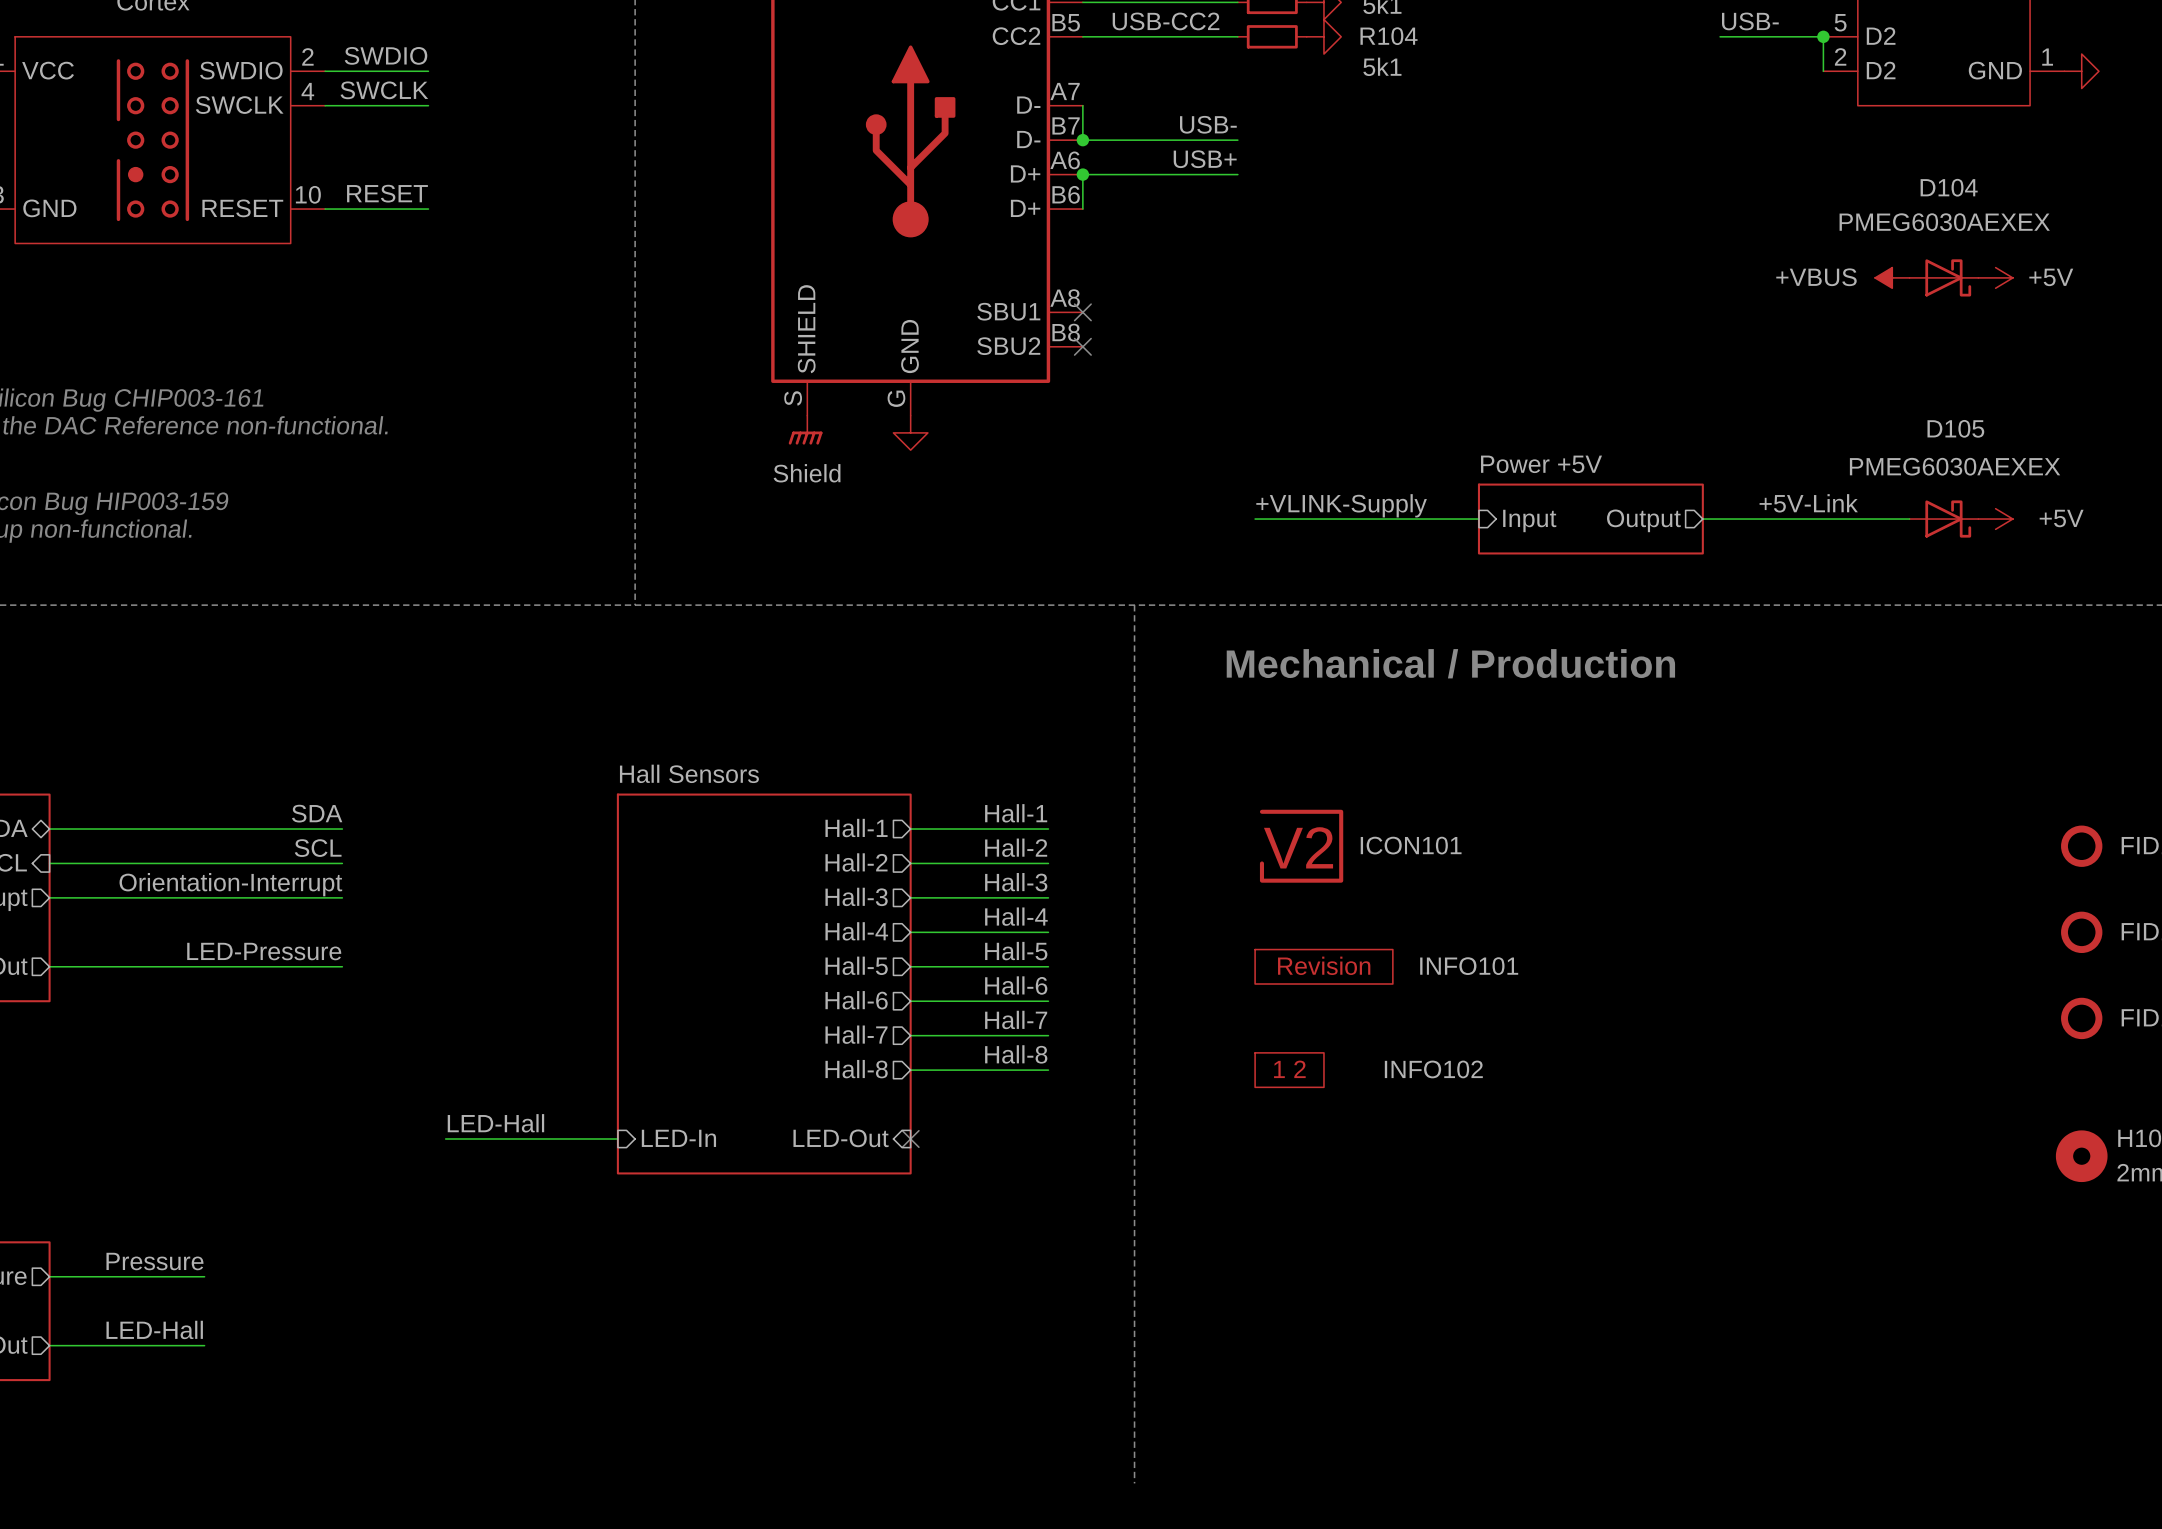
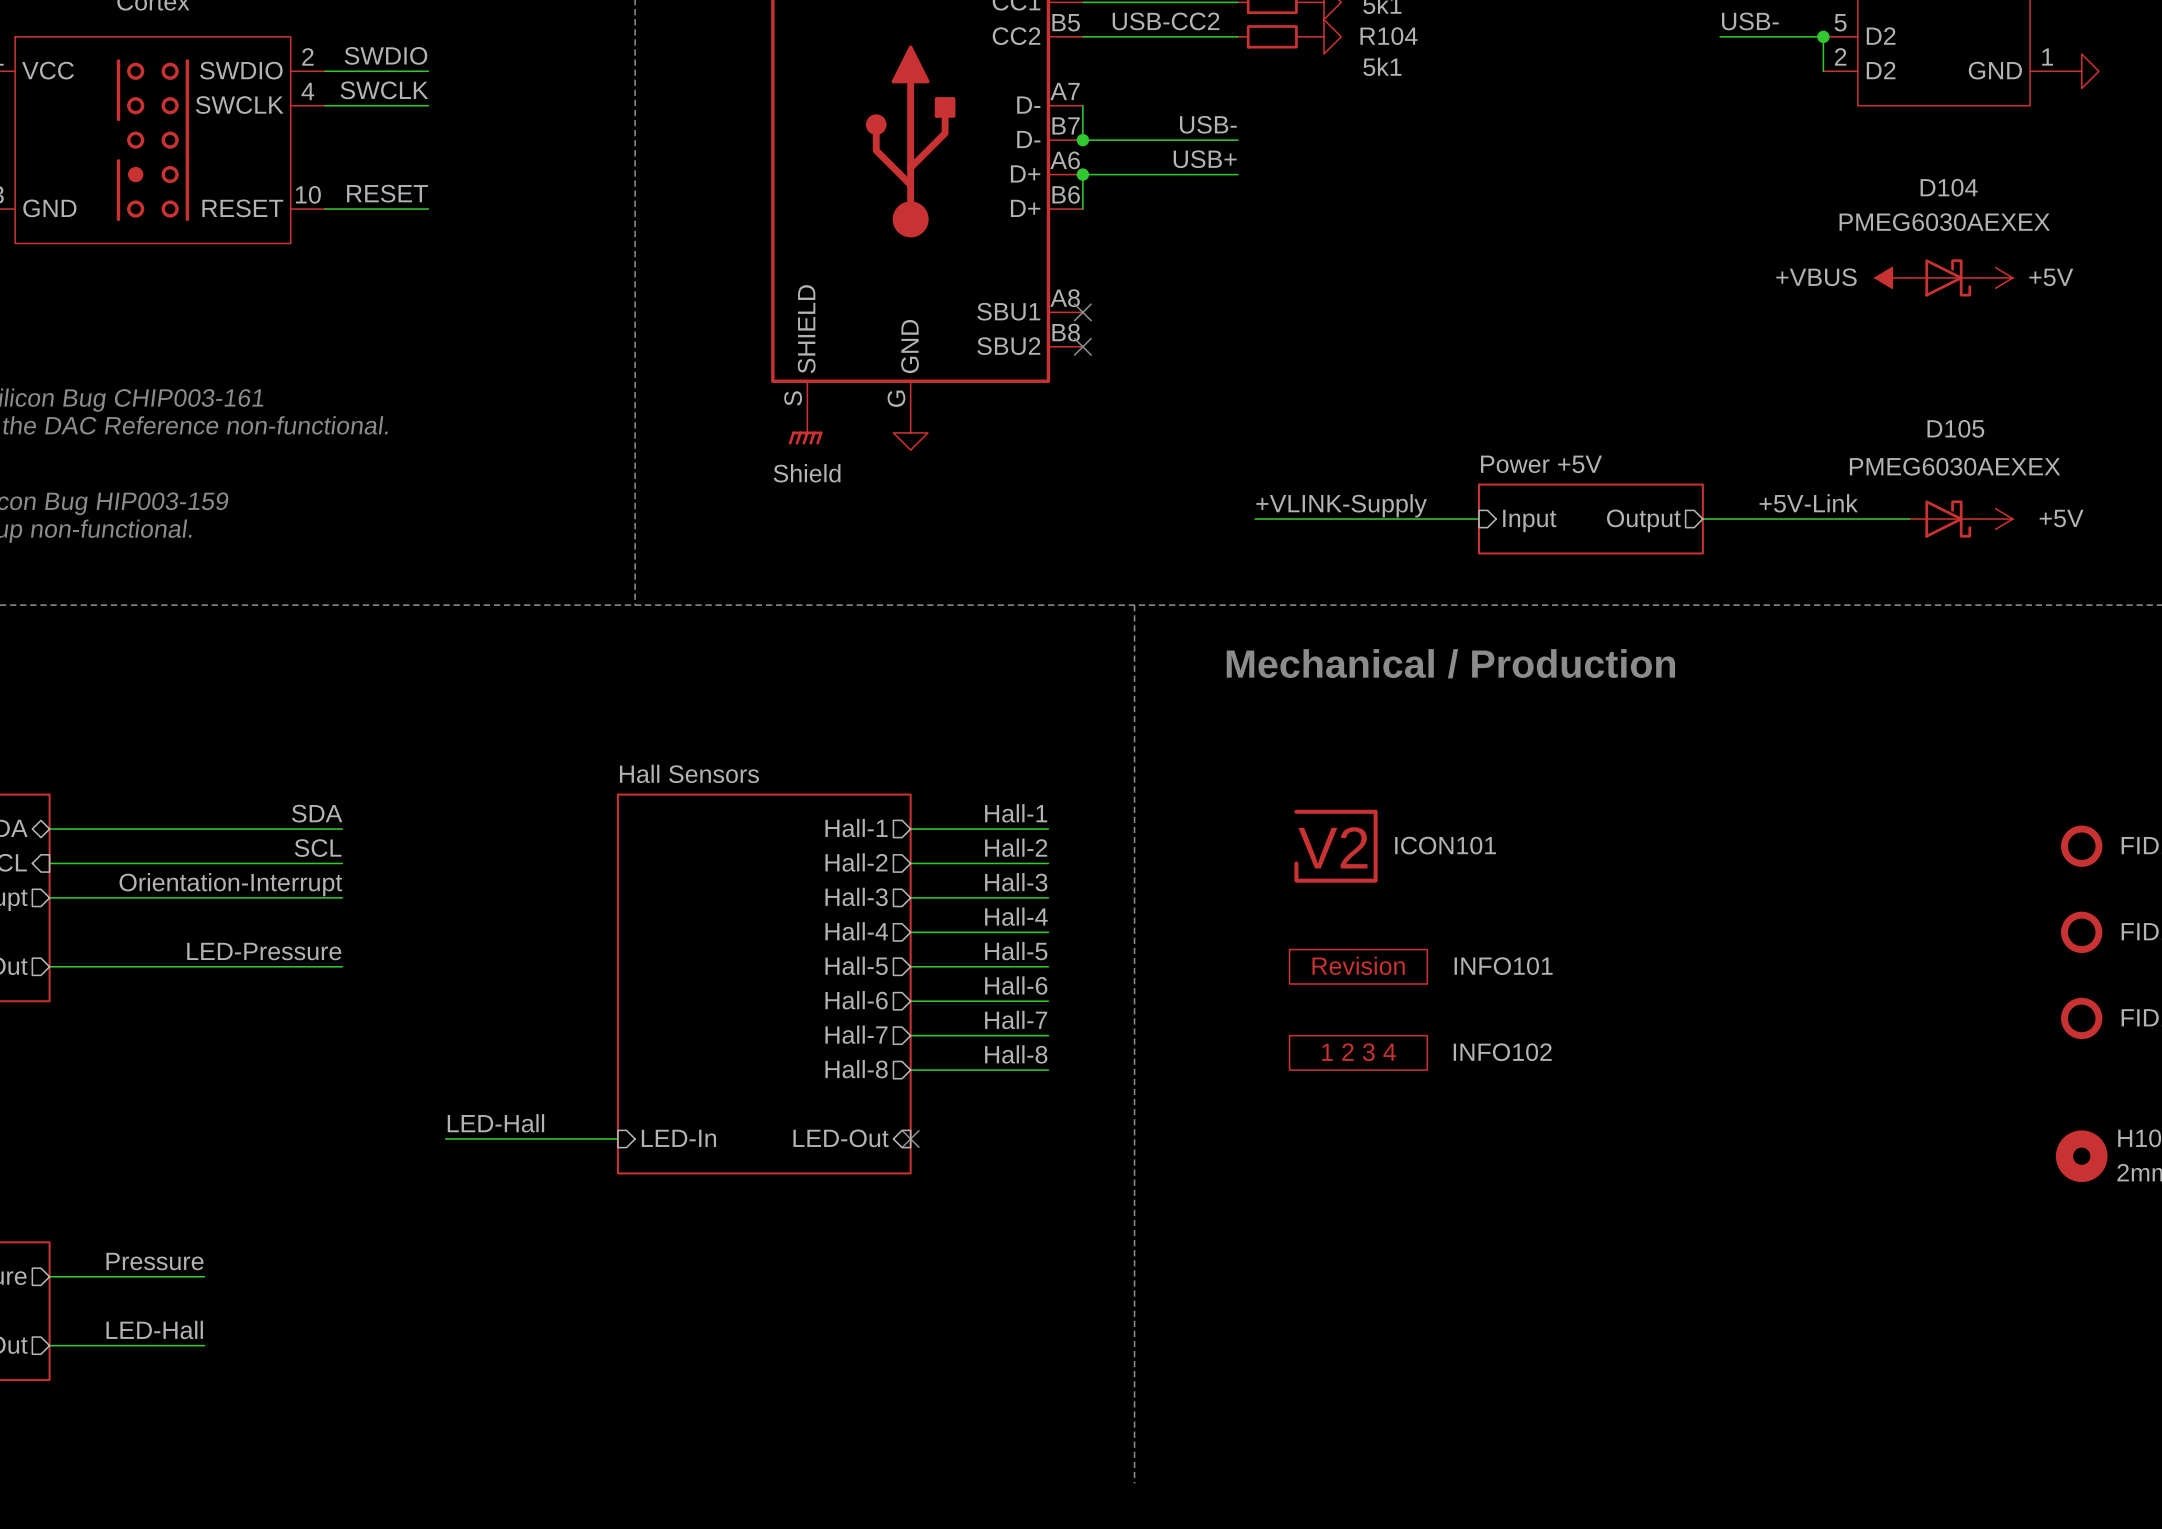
ICON101 position: (1301, 846) -> (1336, 846)
INFO101 position: (1323, 966) -> (1358, 966)
INFO102 symbol: [1255, 1052, 1324, 1088] -> [1289, 1035, 1428, 1071]

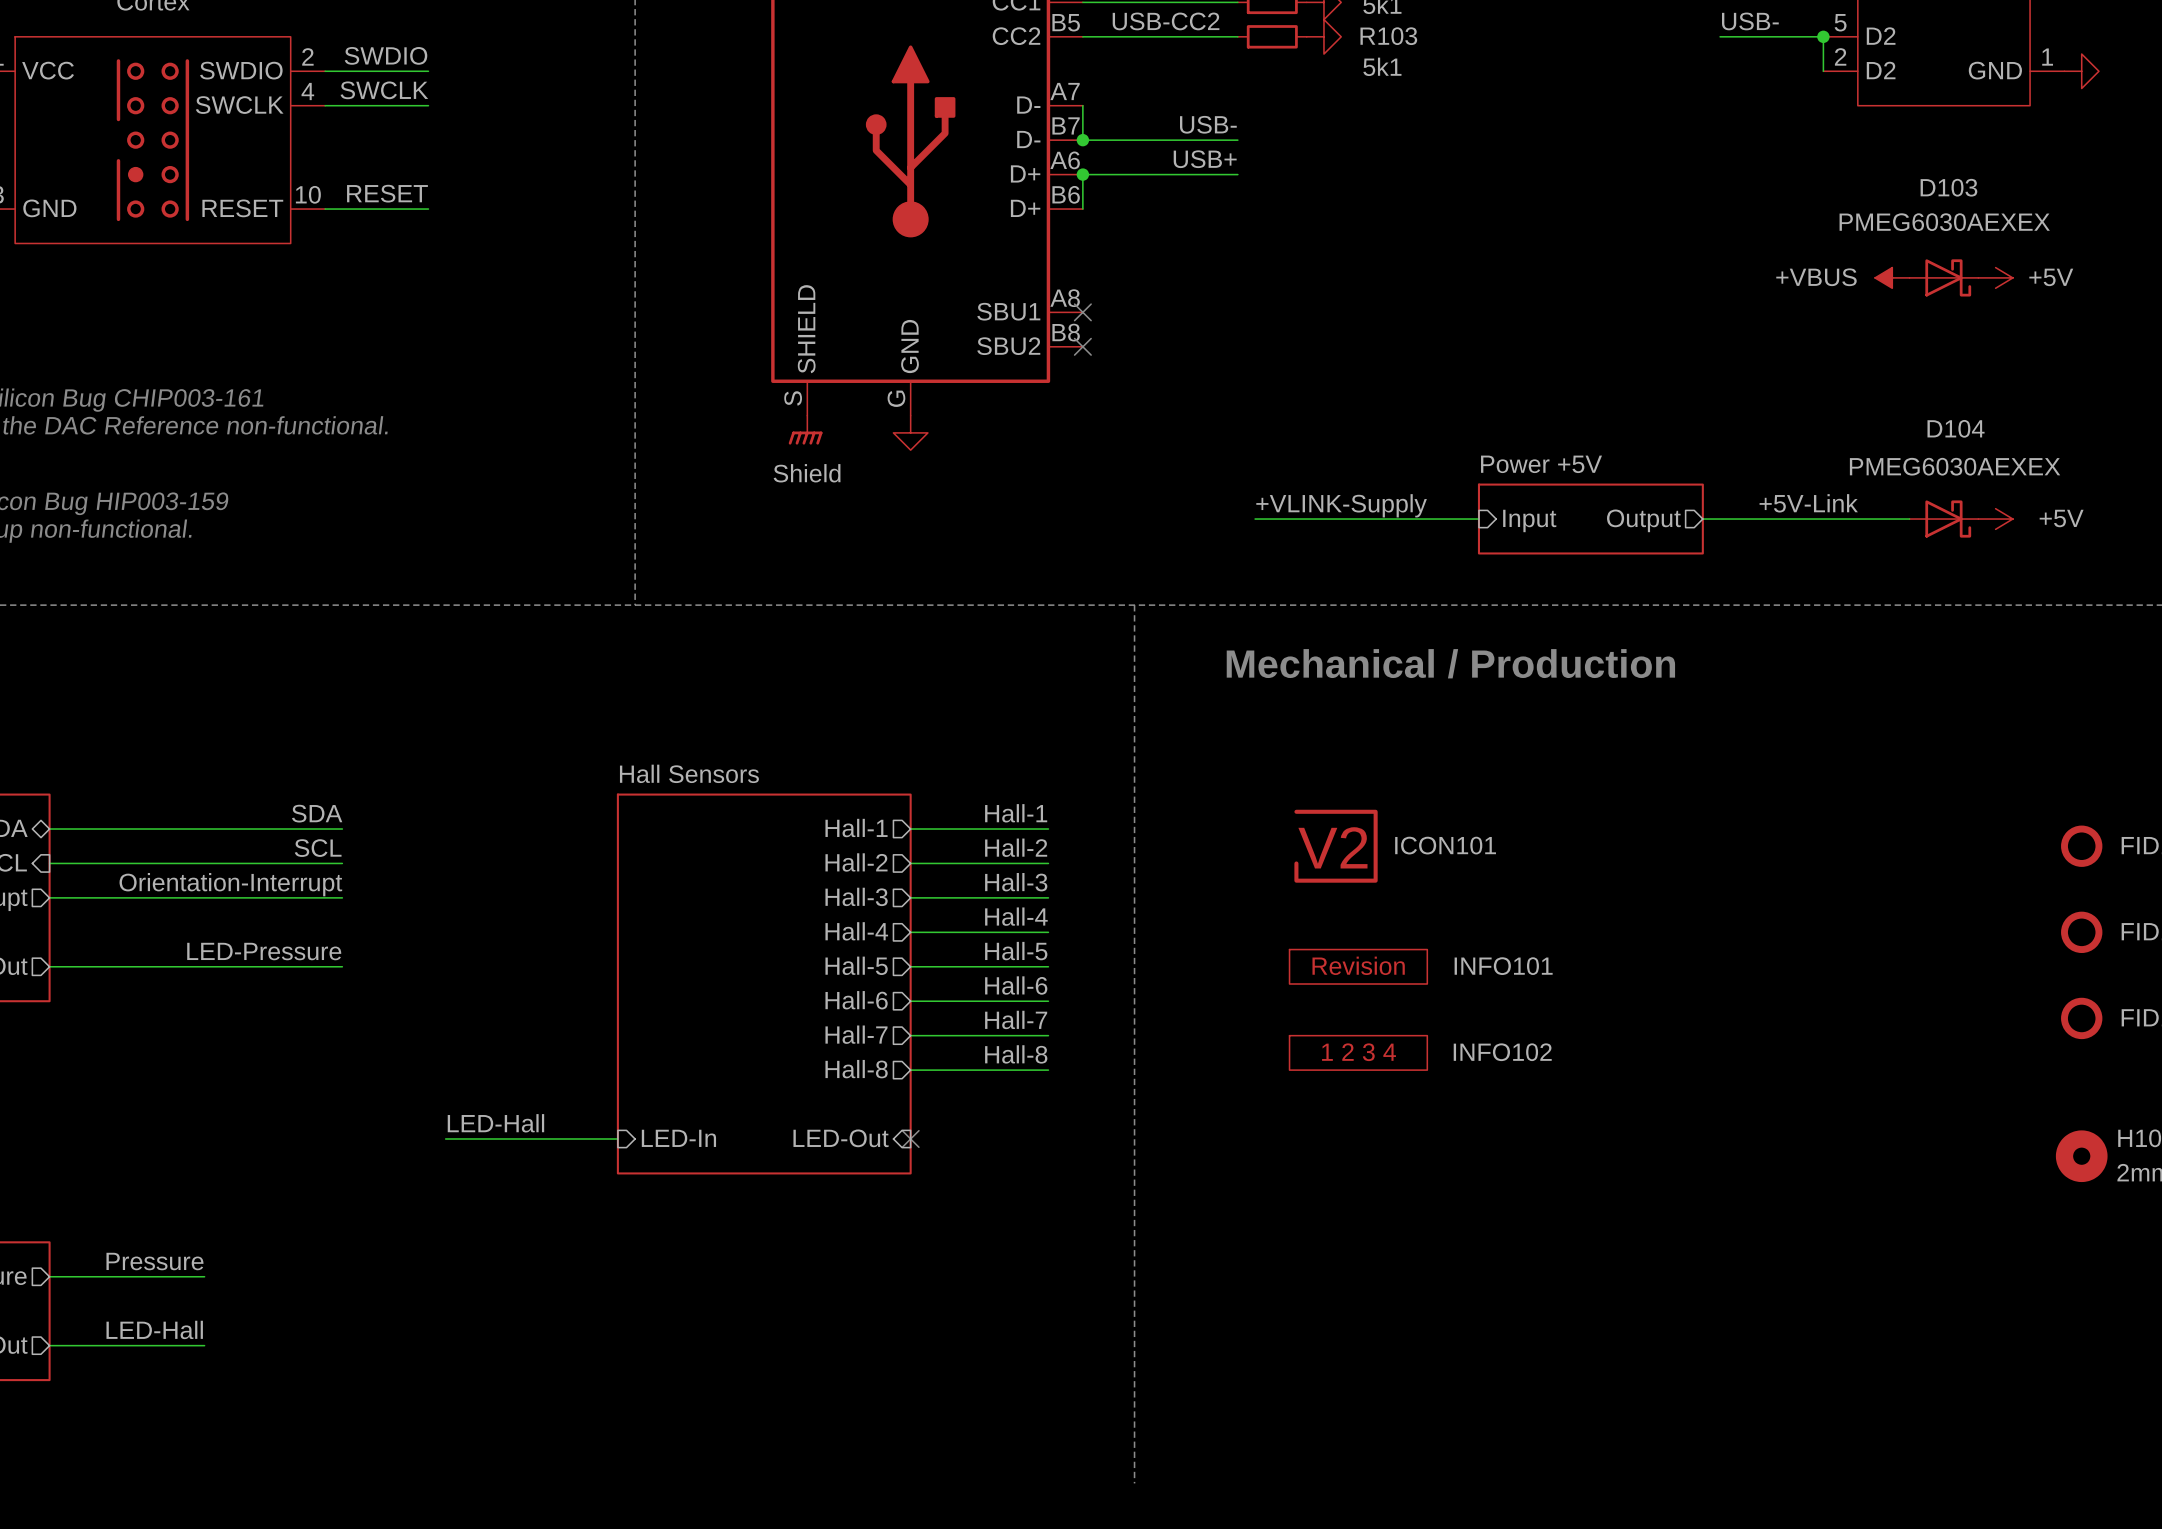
R104 name: R104 (1389, 36) -> R103 (1388, 36)
D104 name: D104 (1949, 187) -> D103 (1948, 187)
D105 name: D105 (1955, 428) -> D104 (1956, 428)

